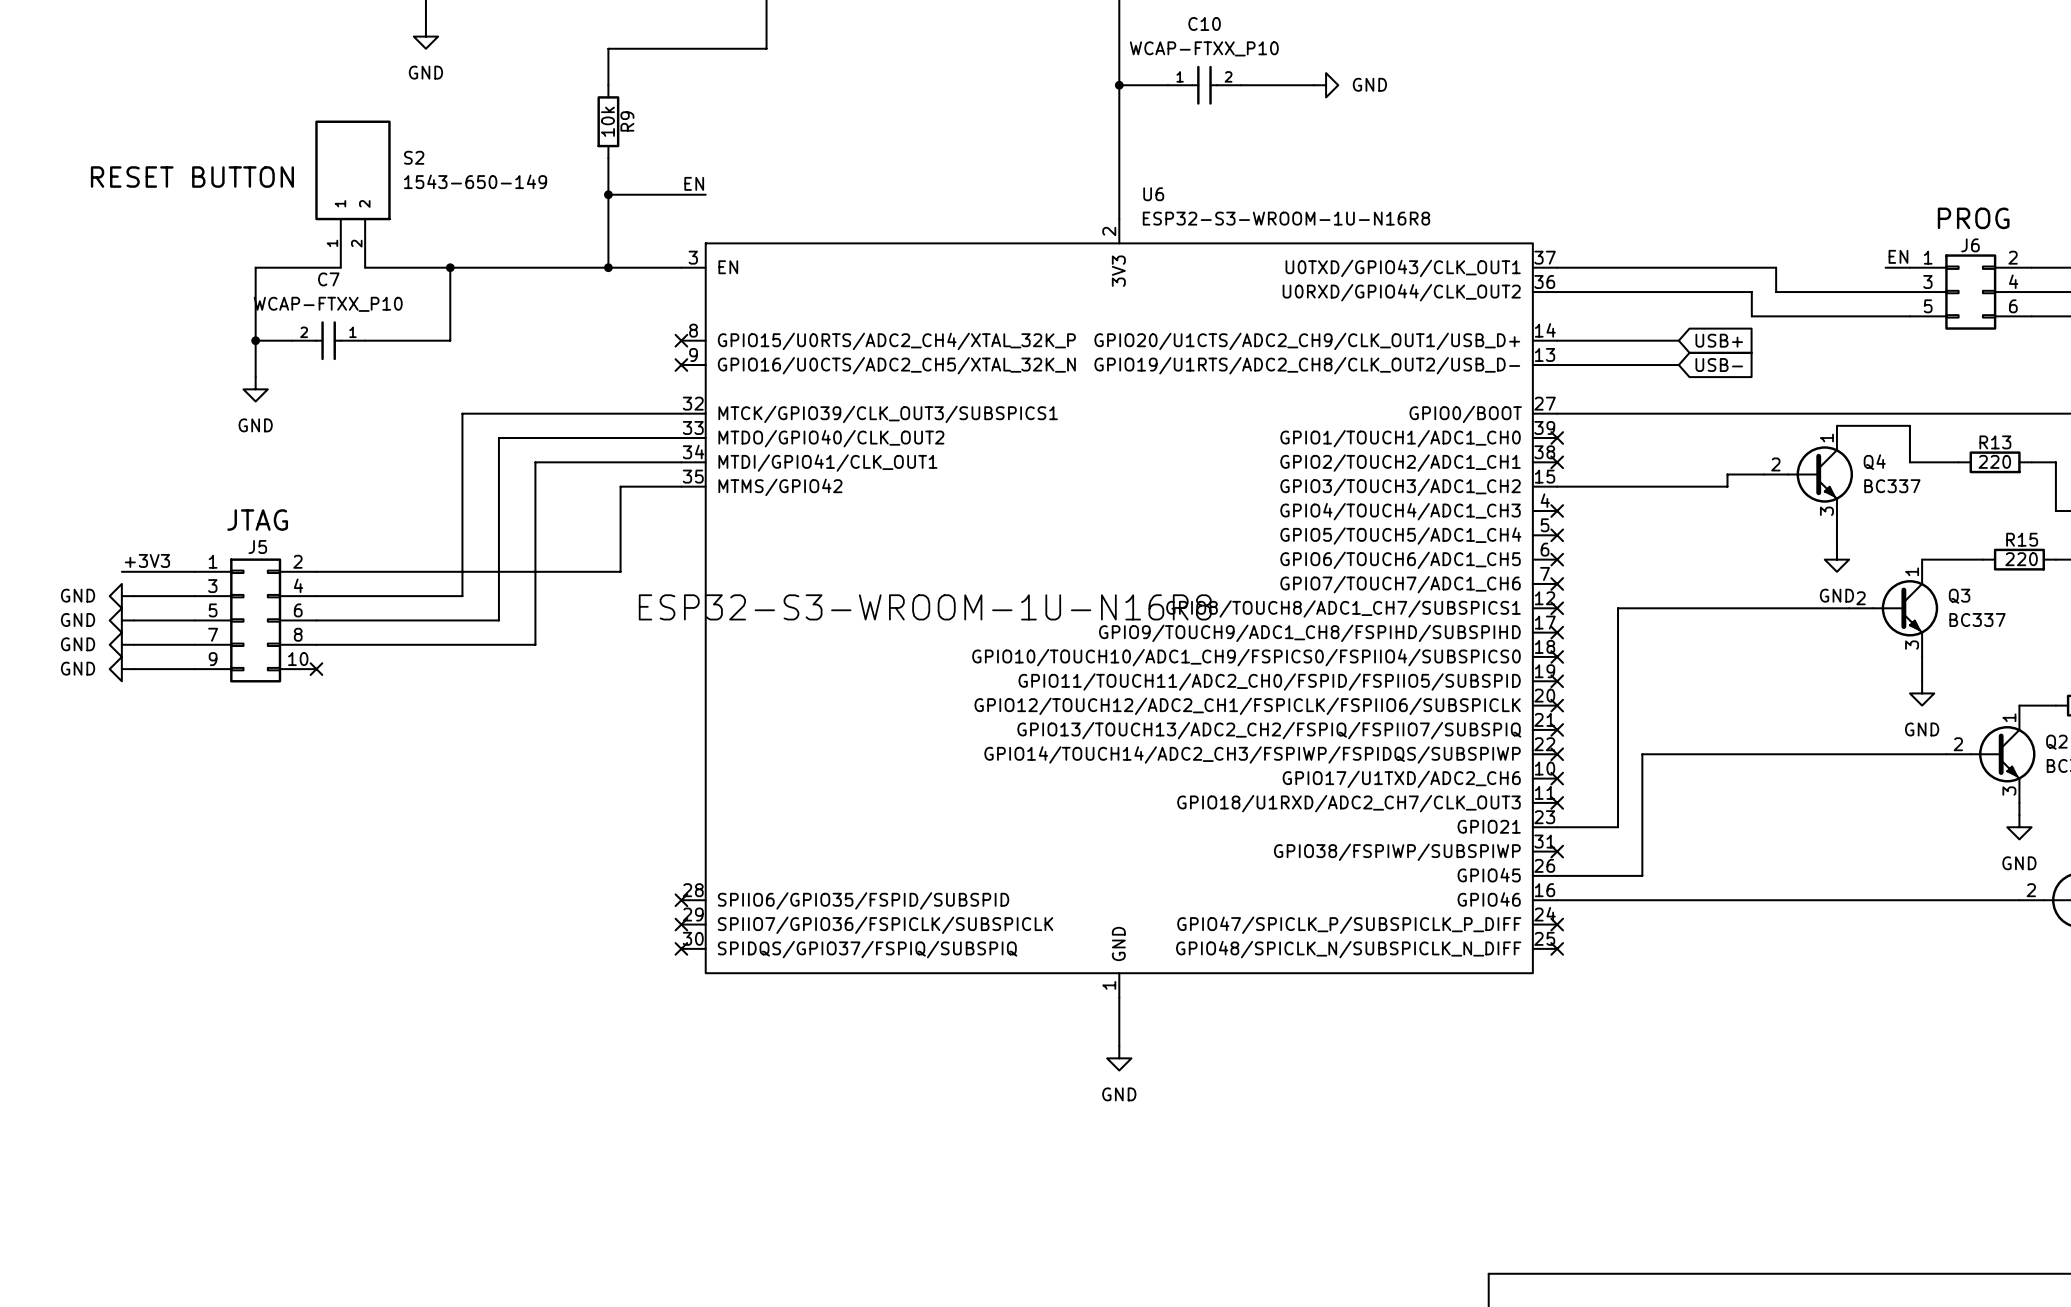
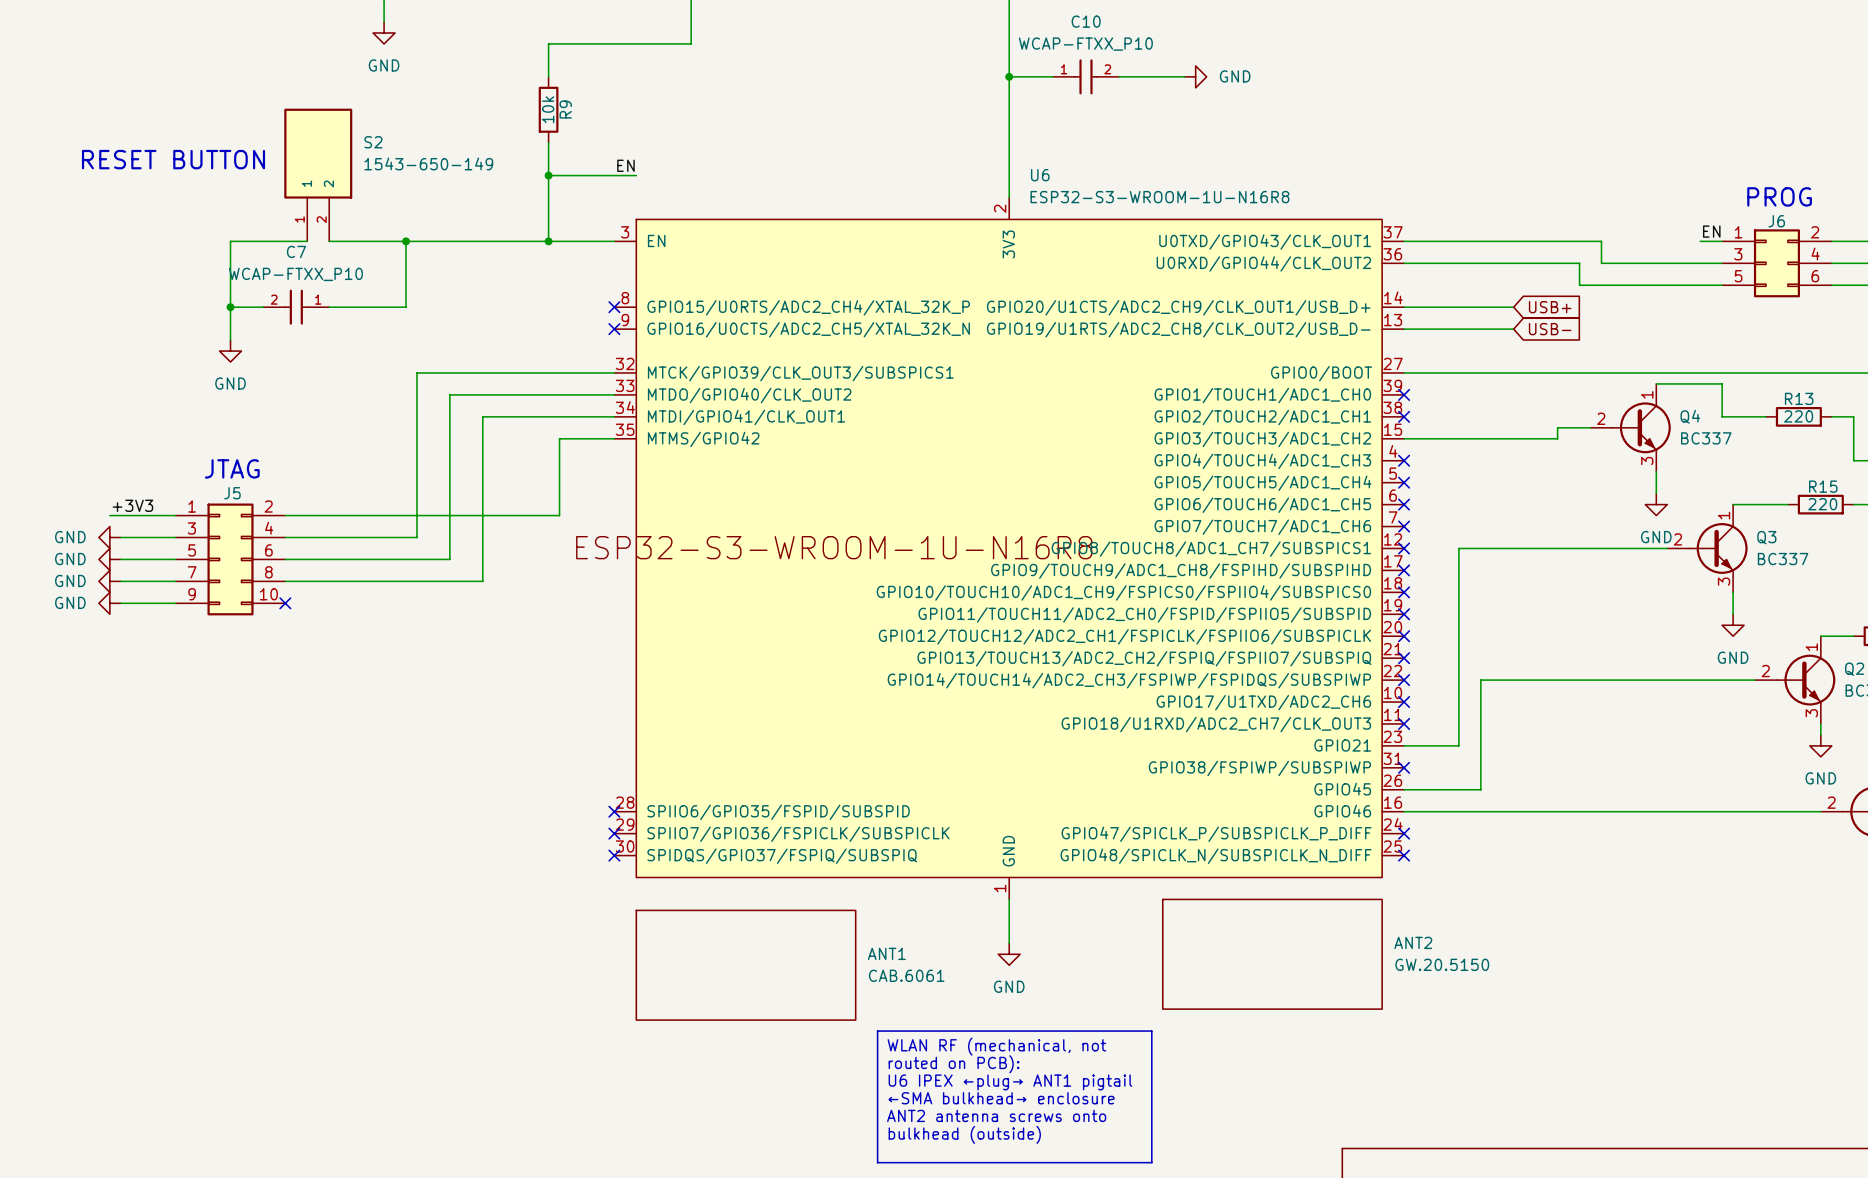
ANT2: none -> GW.20.5150 (1272, 954)
ANT1: none -> CAB.6061 (746, 965)
line: none -> (877, 1031) (1151, 1031) (1151, 1162) (877, 1162) (877, 1031)
text: none -> WLAN RF (mechanical, not (996, 1046)
text: none -> routed on PCB): (954, 1064)
text: none -> U6 IPEX ←plug→ ANT1 pigtail (1010, 1082)
text: none -> ←SMA bulkhead→ enclosure (1001, 1098)
text: none -> ANT2 antenna screws onto (996, 1115)
text: none -> bulkhead (outside) (964, 1134)

